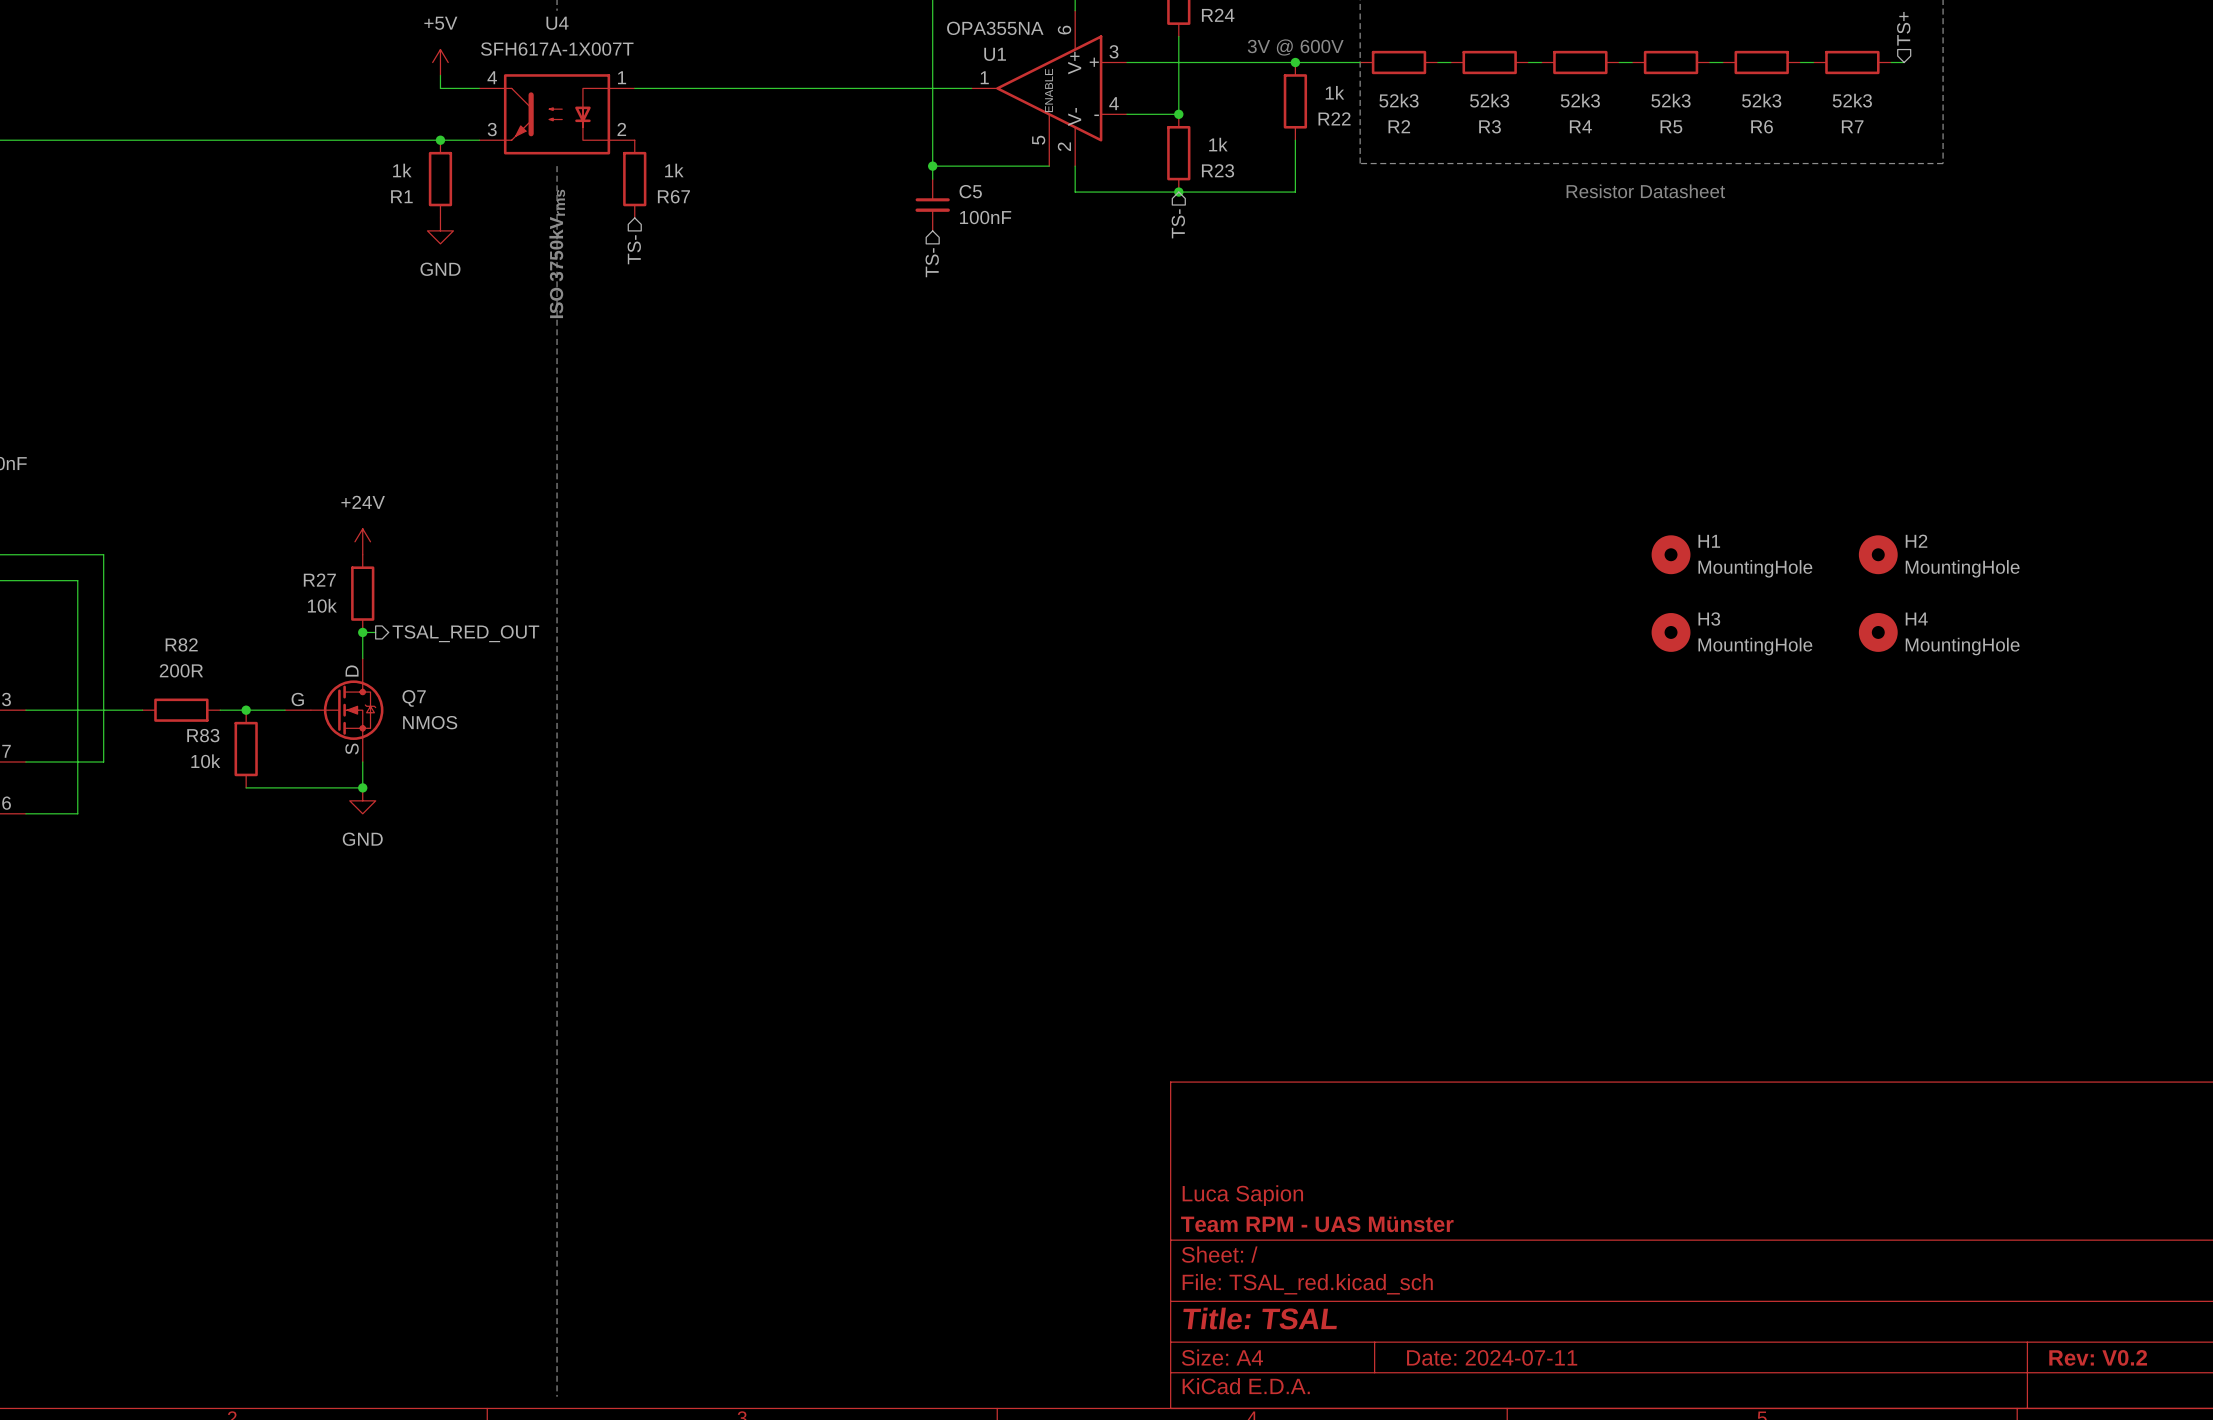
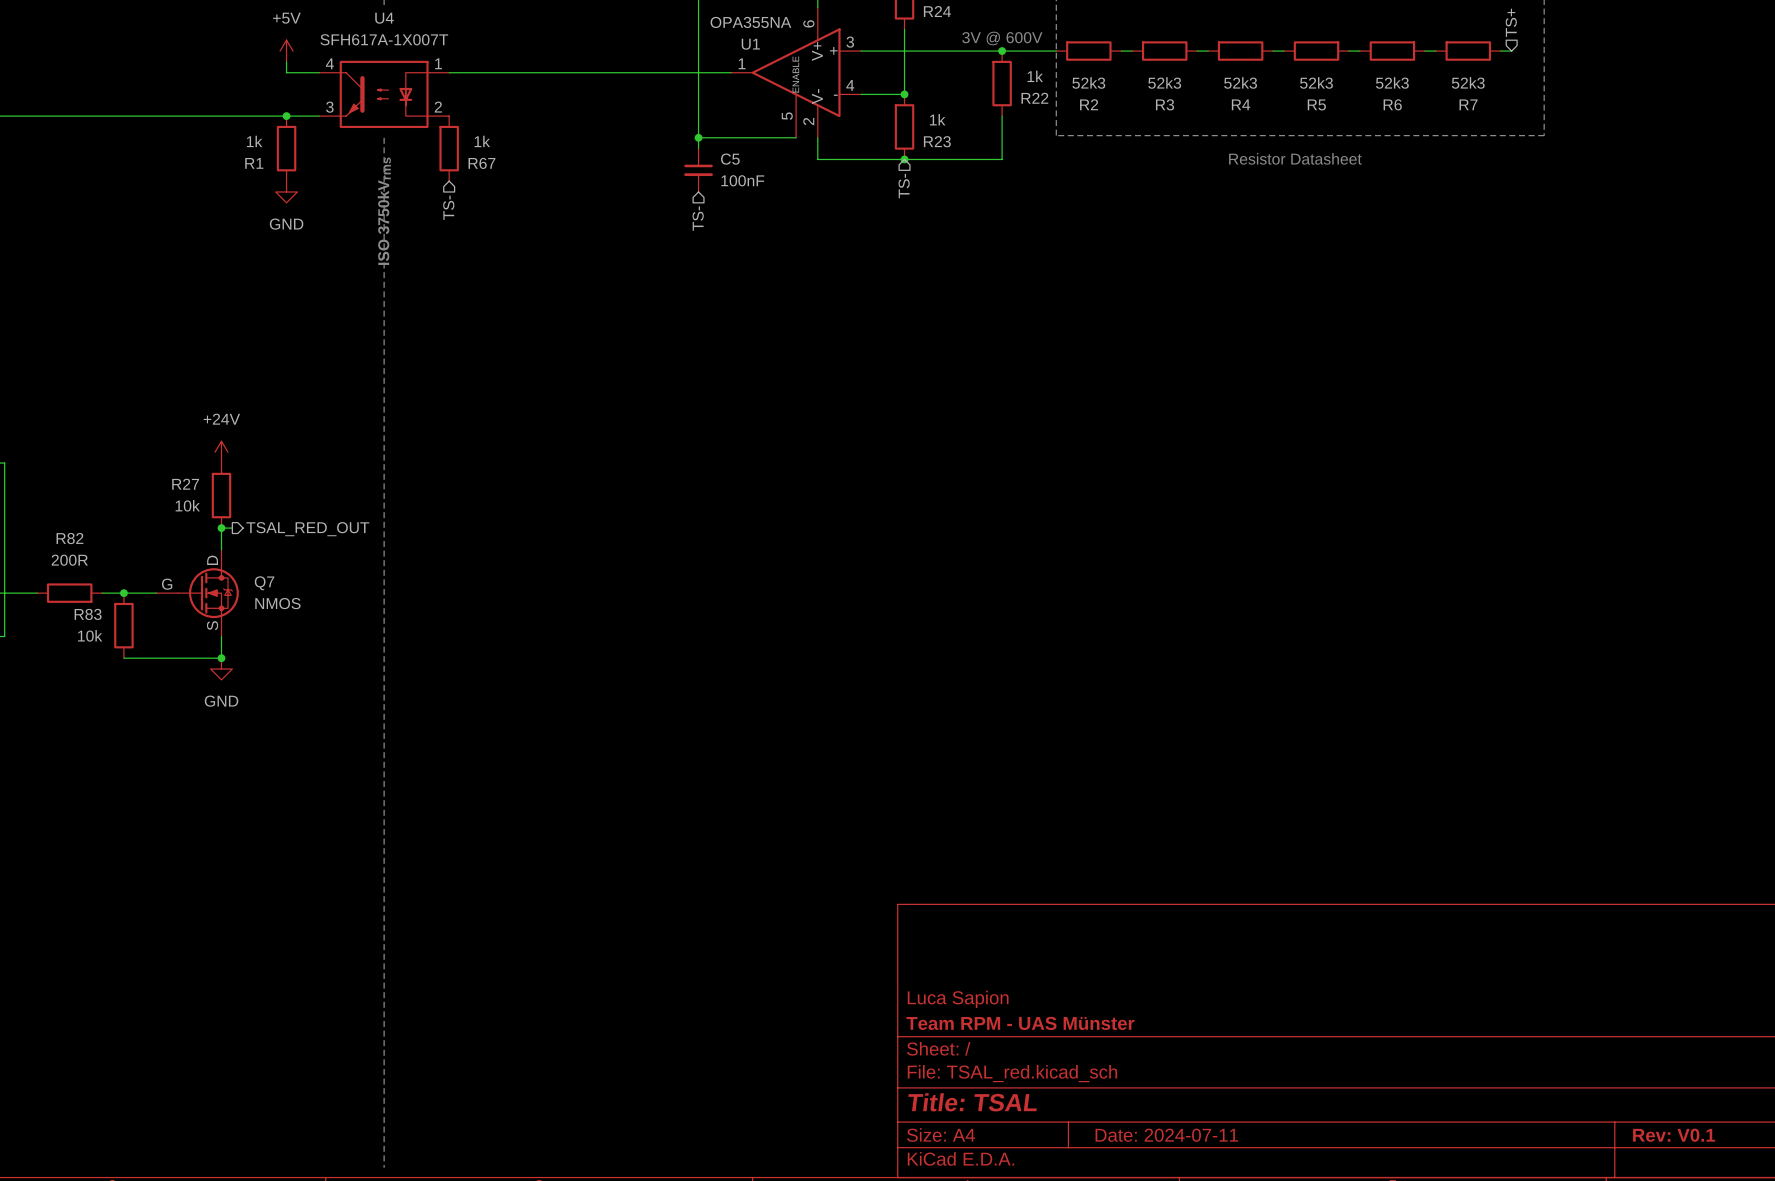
H1: MountingHole (1671, 554) -> none
H2: MountingHole (1878, 554) -> none
H3: MountingHole (1671, 632) -> none
H4: MountingHole (1878, 632) -> none
title block: Rev: V0.2 (2098, 1357) -> Rev: V0.1 (1674, 1135)

